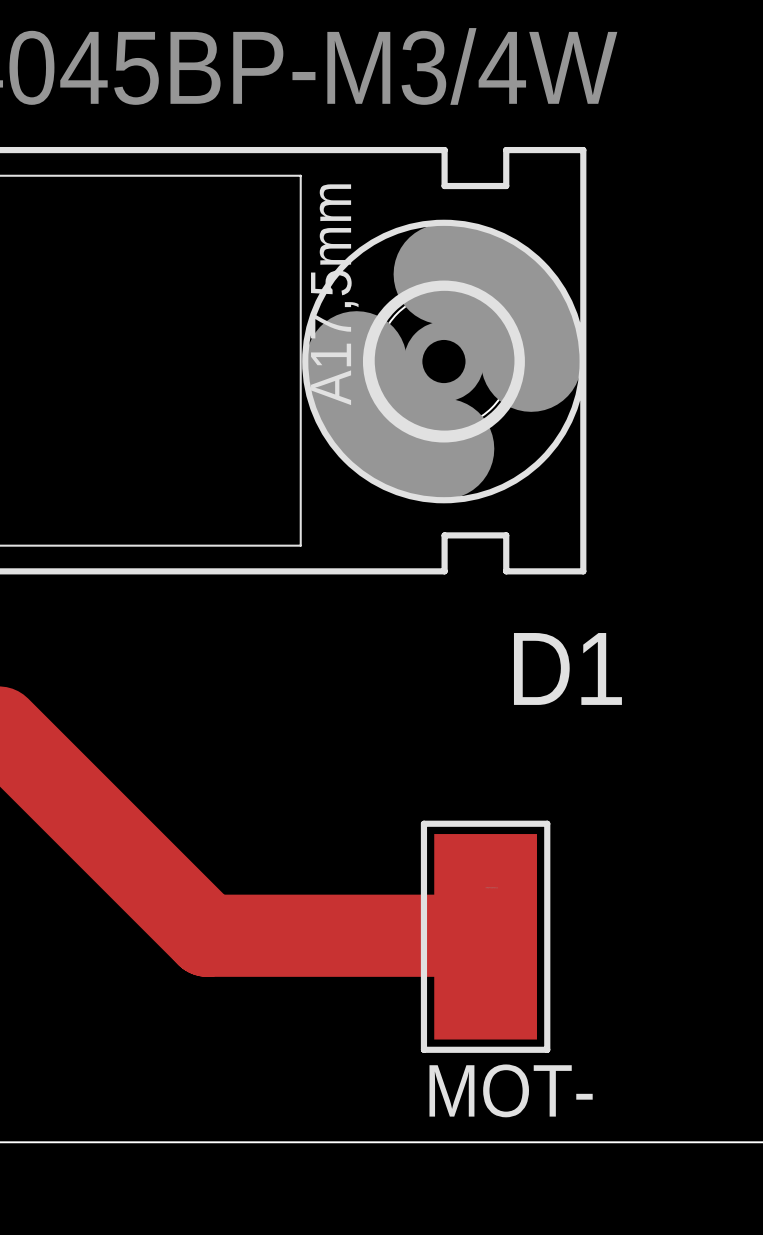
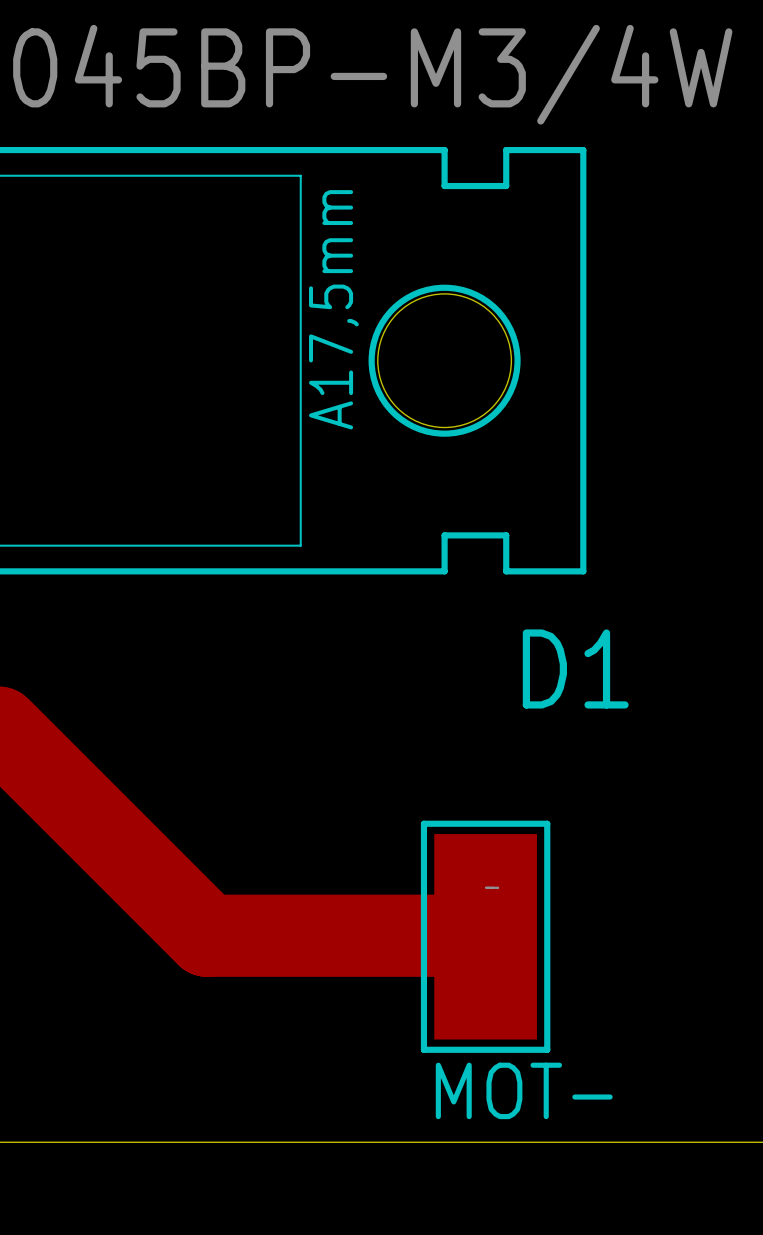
part: (443, 361) -> none

